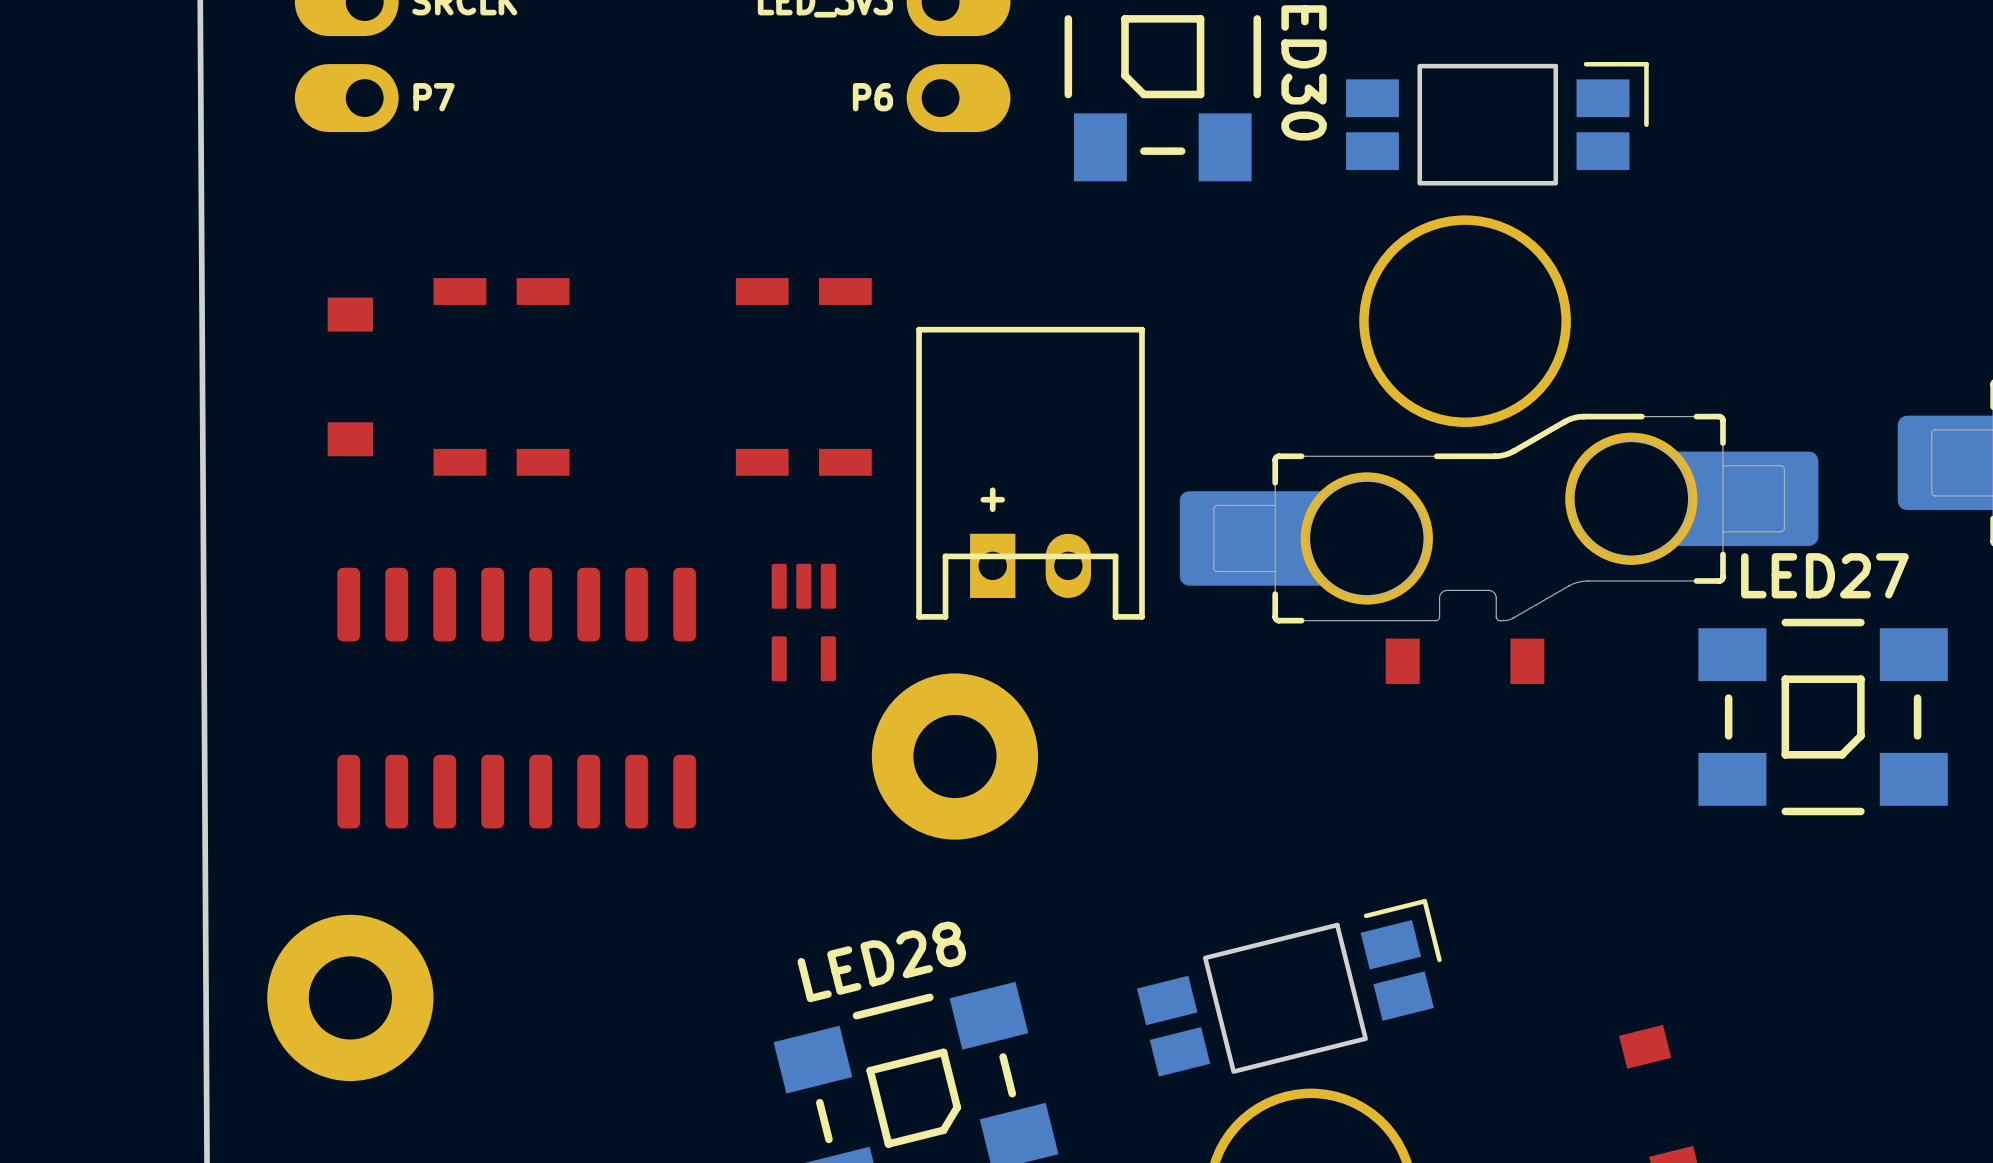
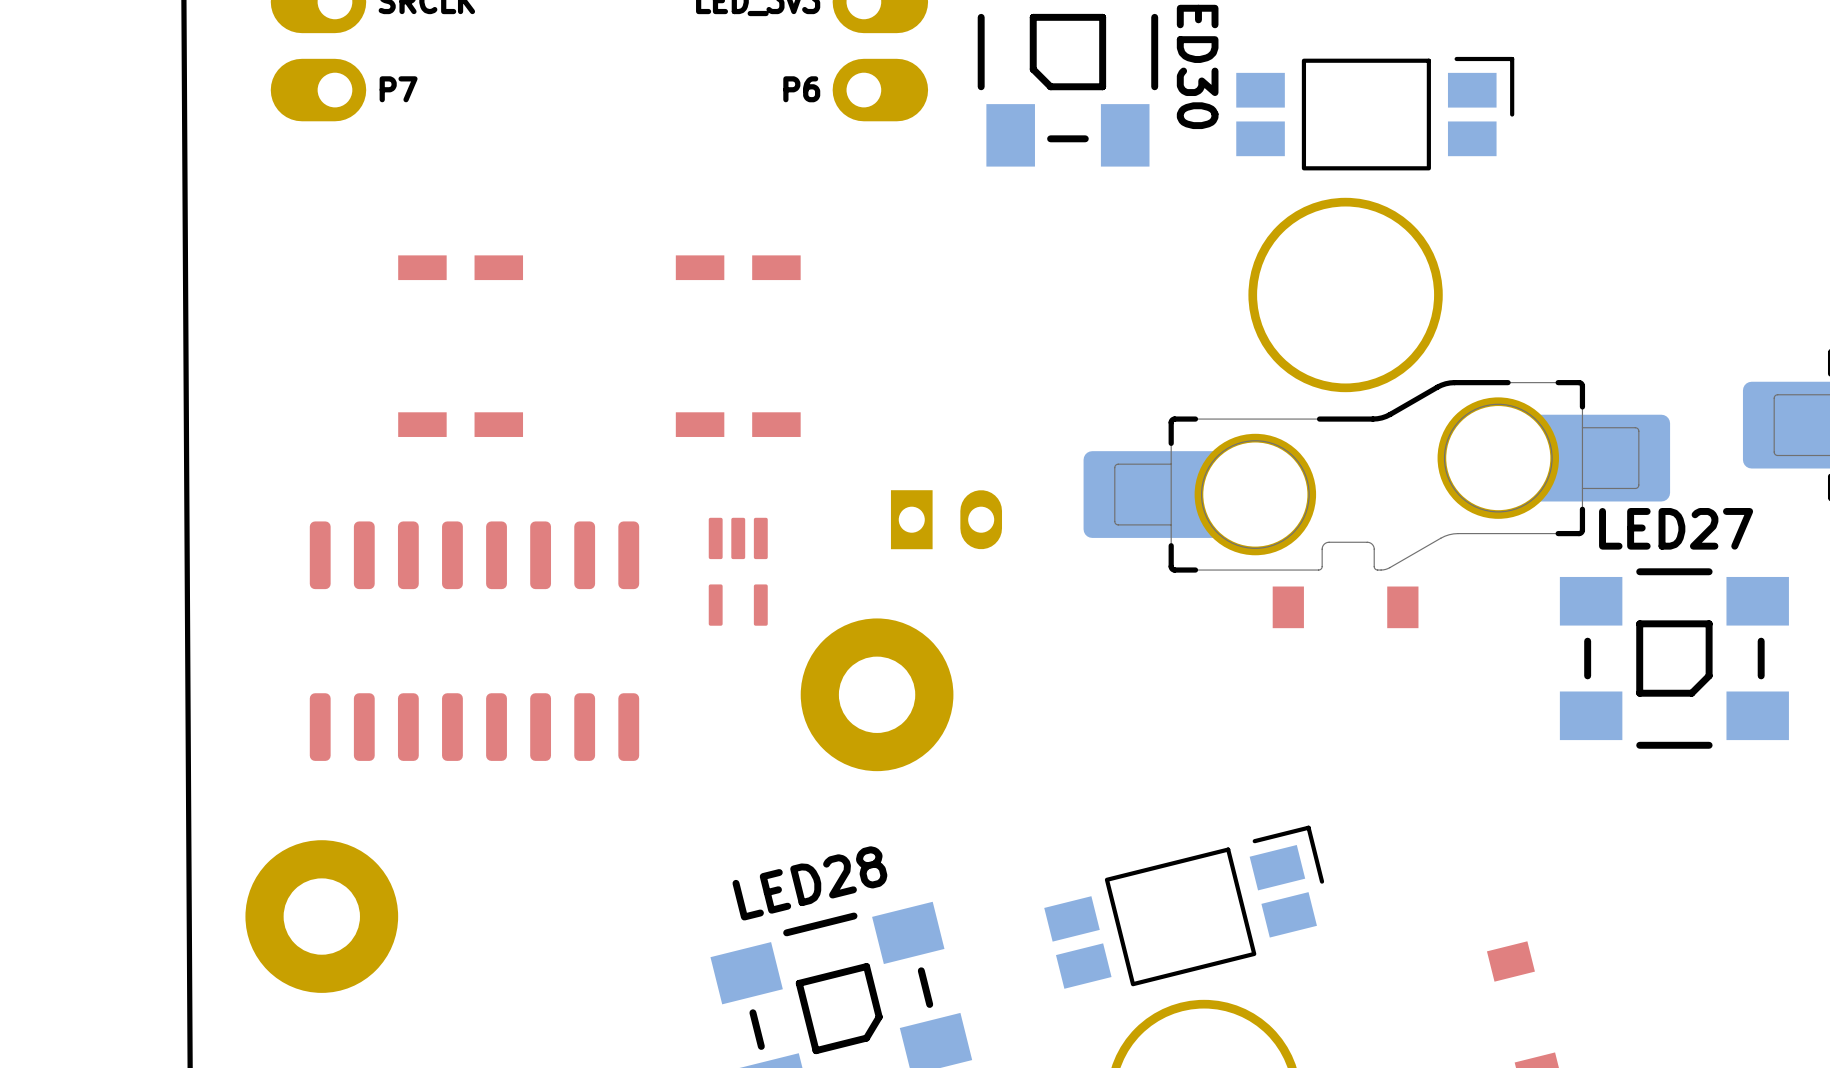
part: (350, 376) -> none
part: (1030, 473) -> none
part: none -> (946, 519)

